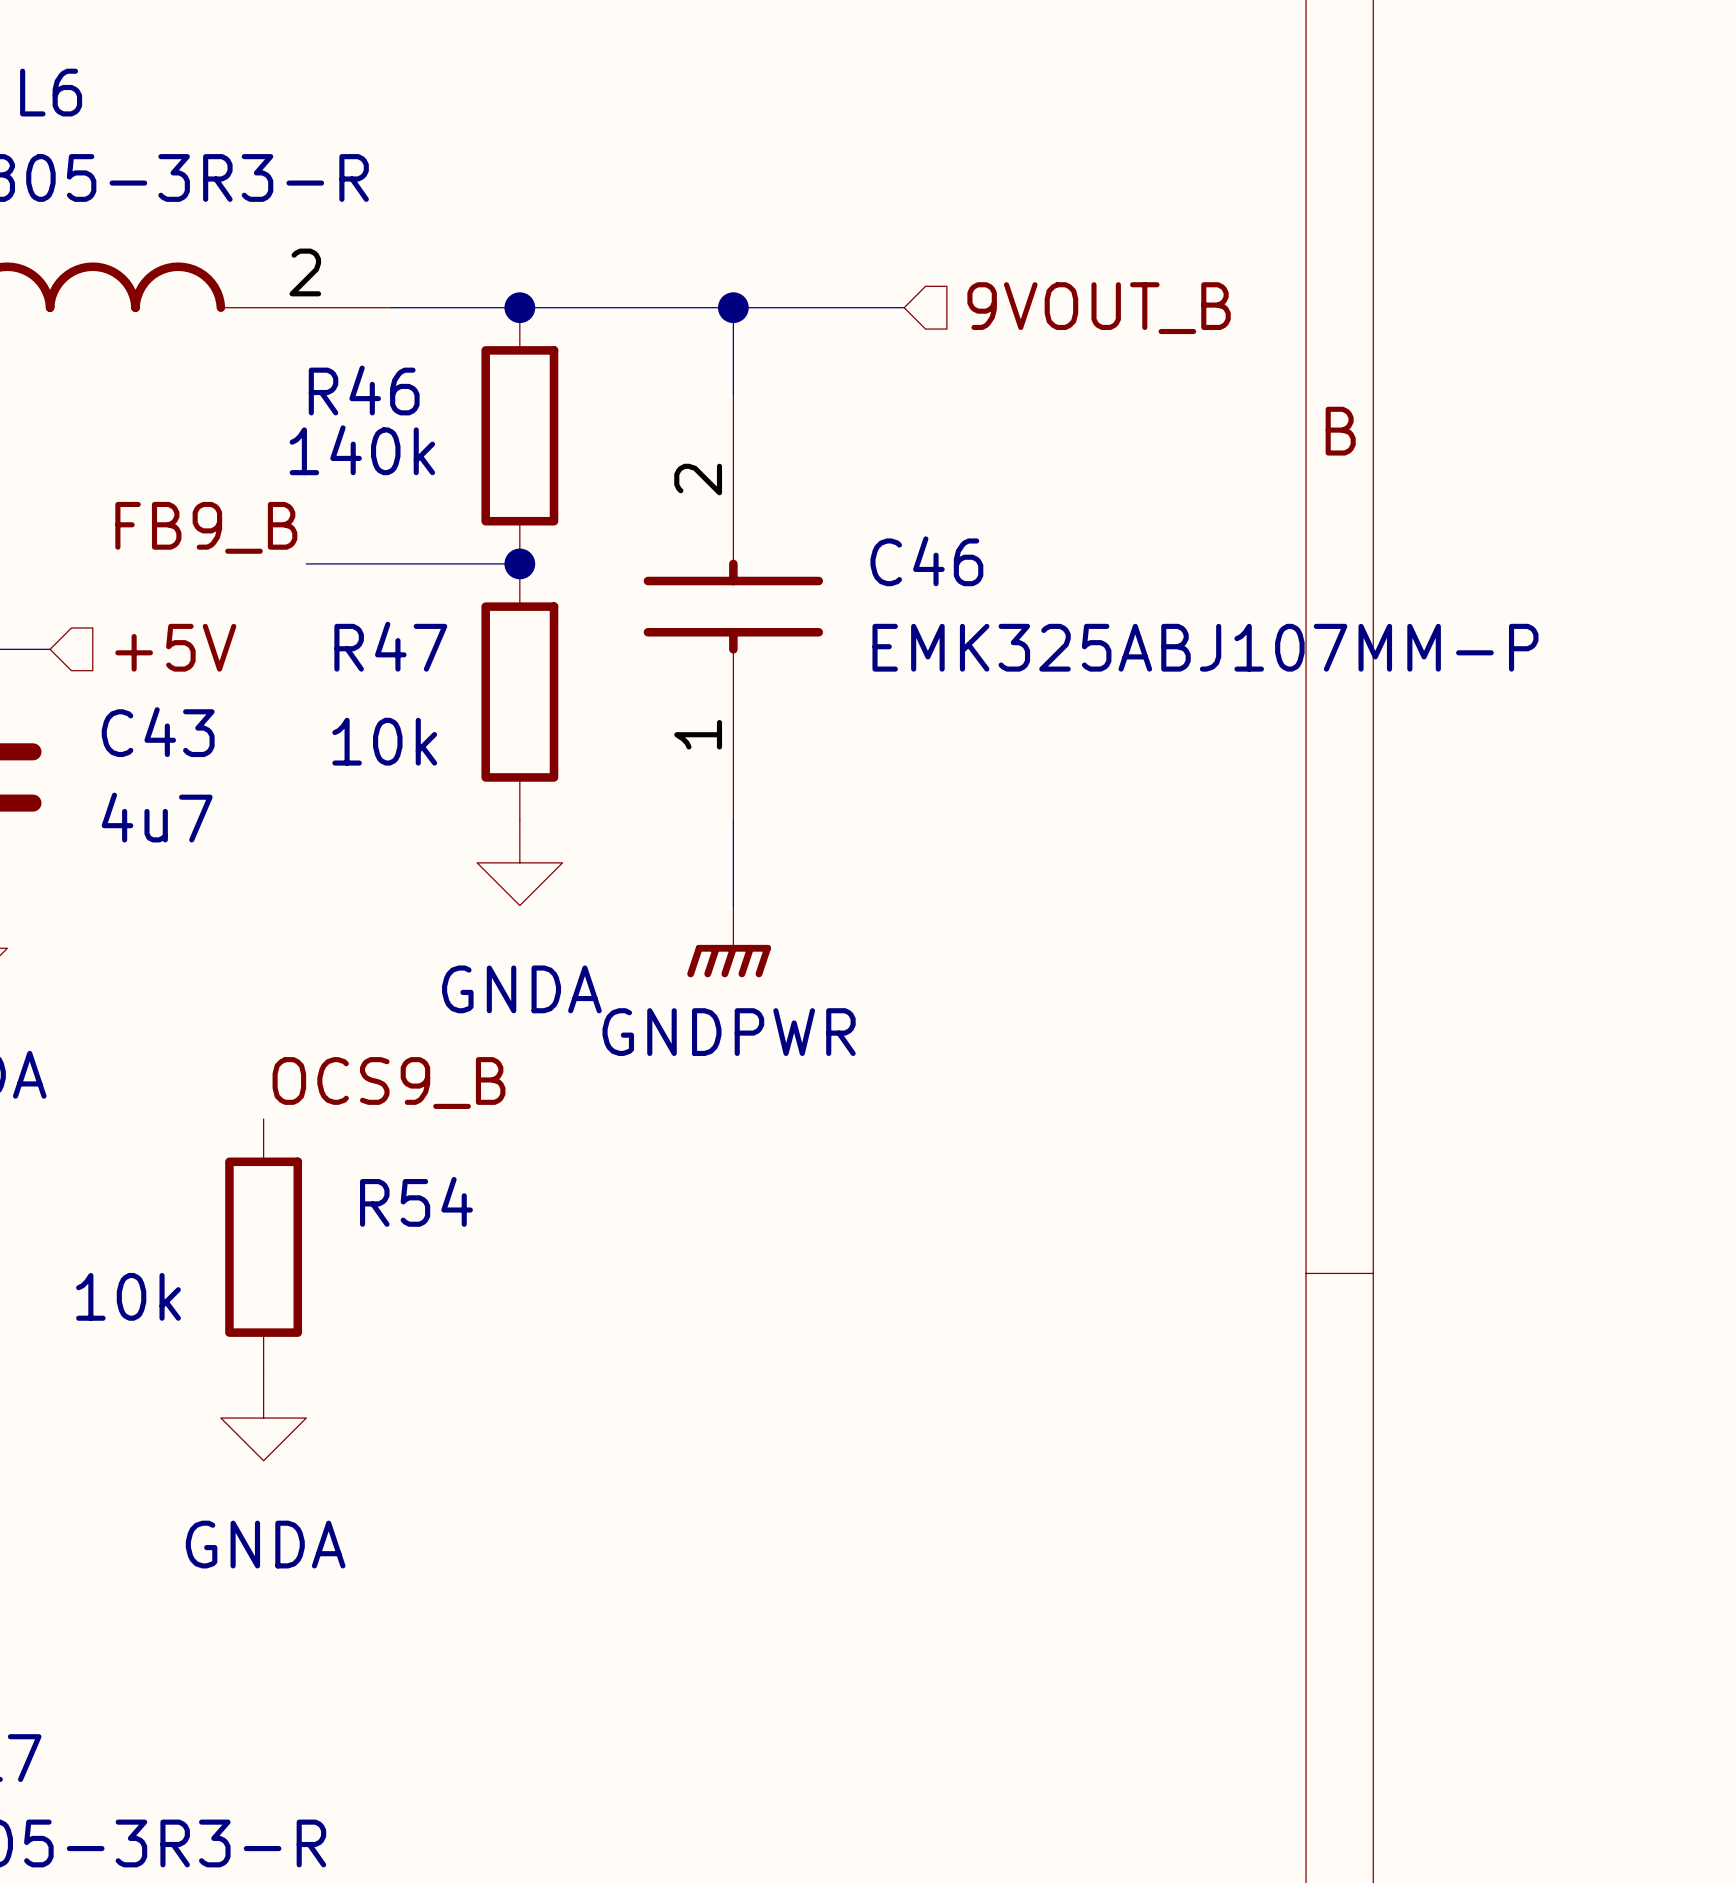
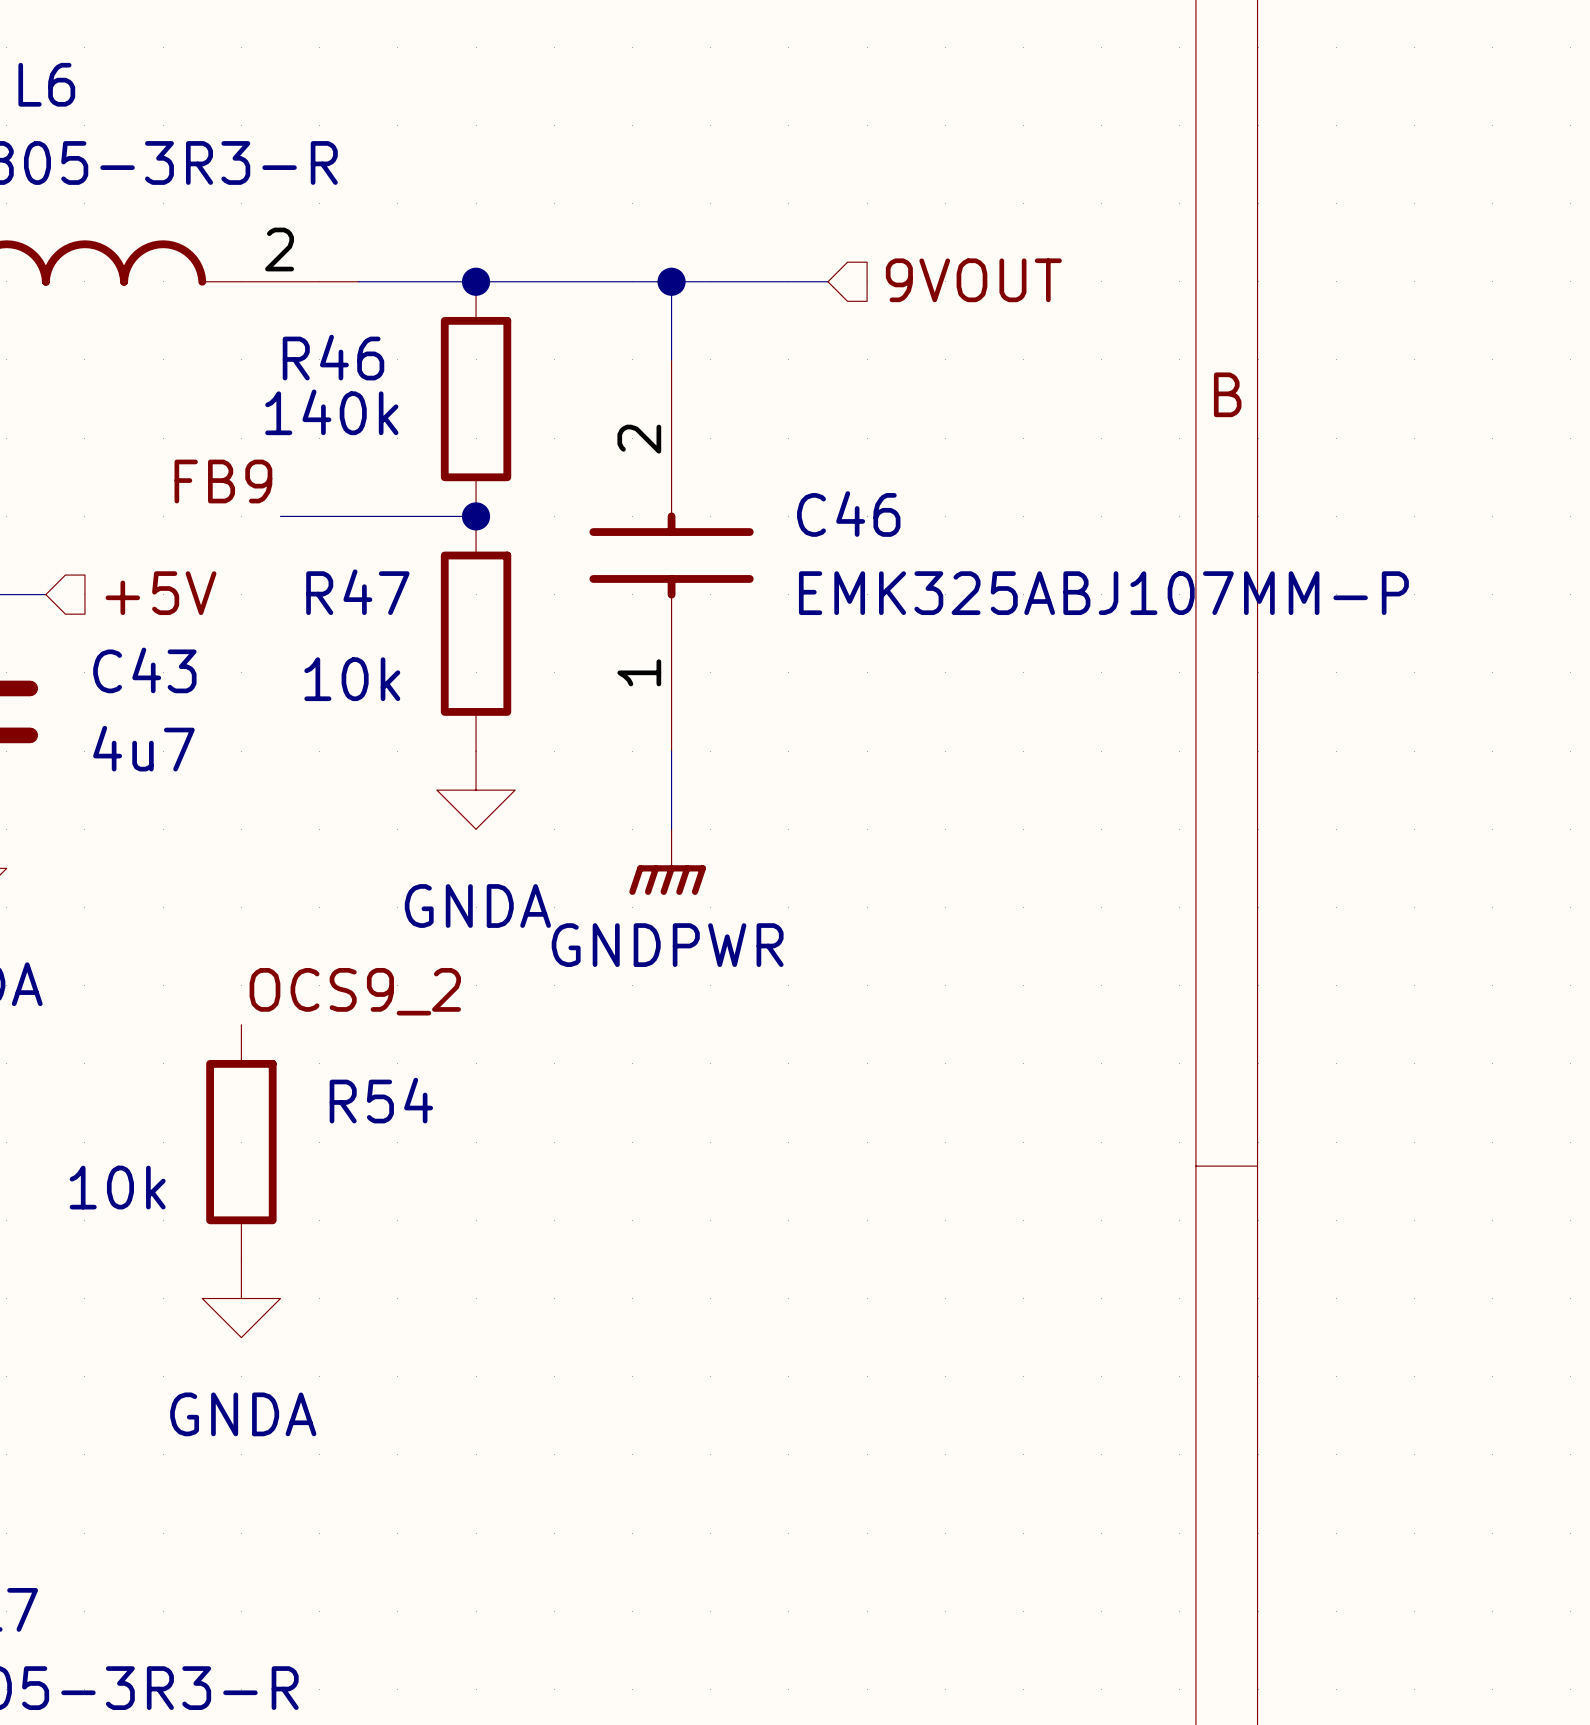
hierarchical label: 9VOUT_B (1099, 308) -> 9VOUT (973, 280)
label: FB9_B (206, 527) -> FB9 (223, 481)
label: OCS9_B (388, 1083) -> OCS9_2 (355, 991)

